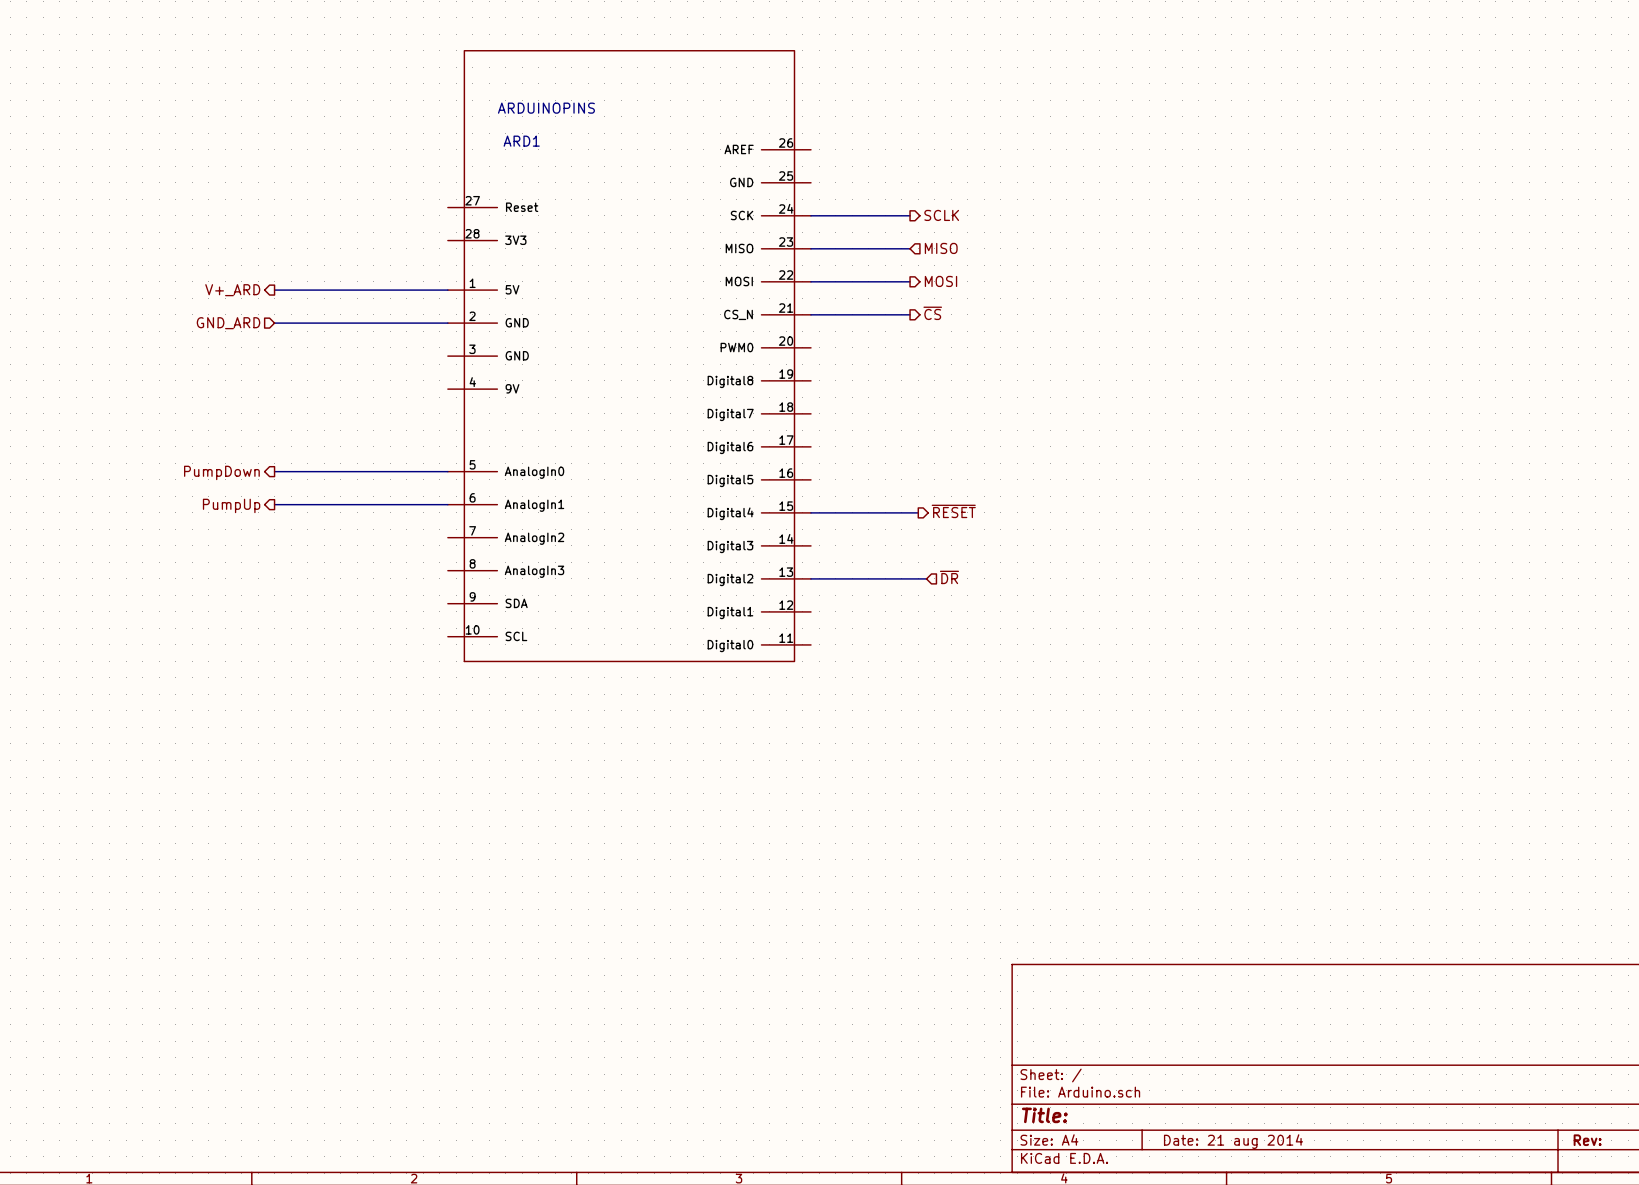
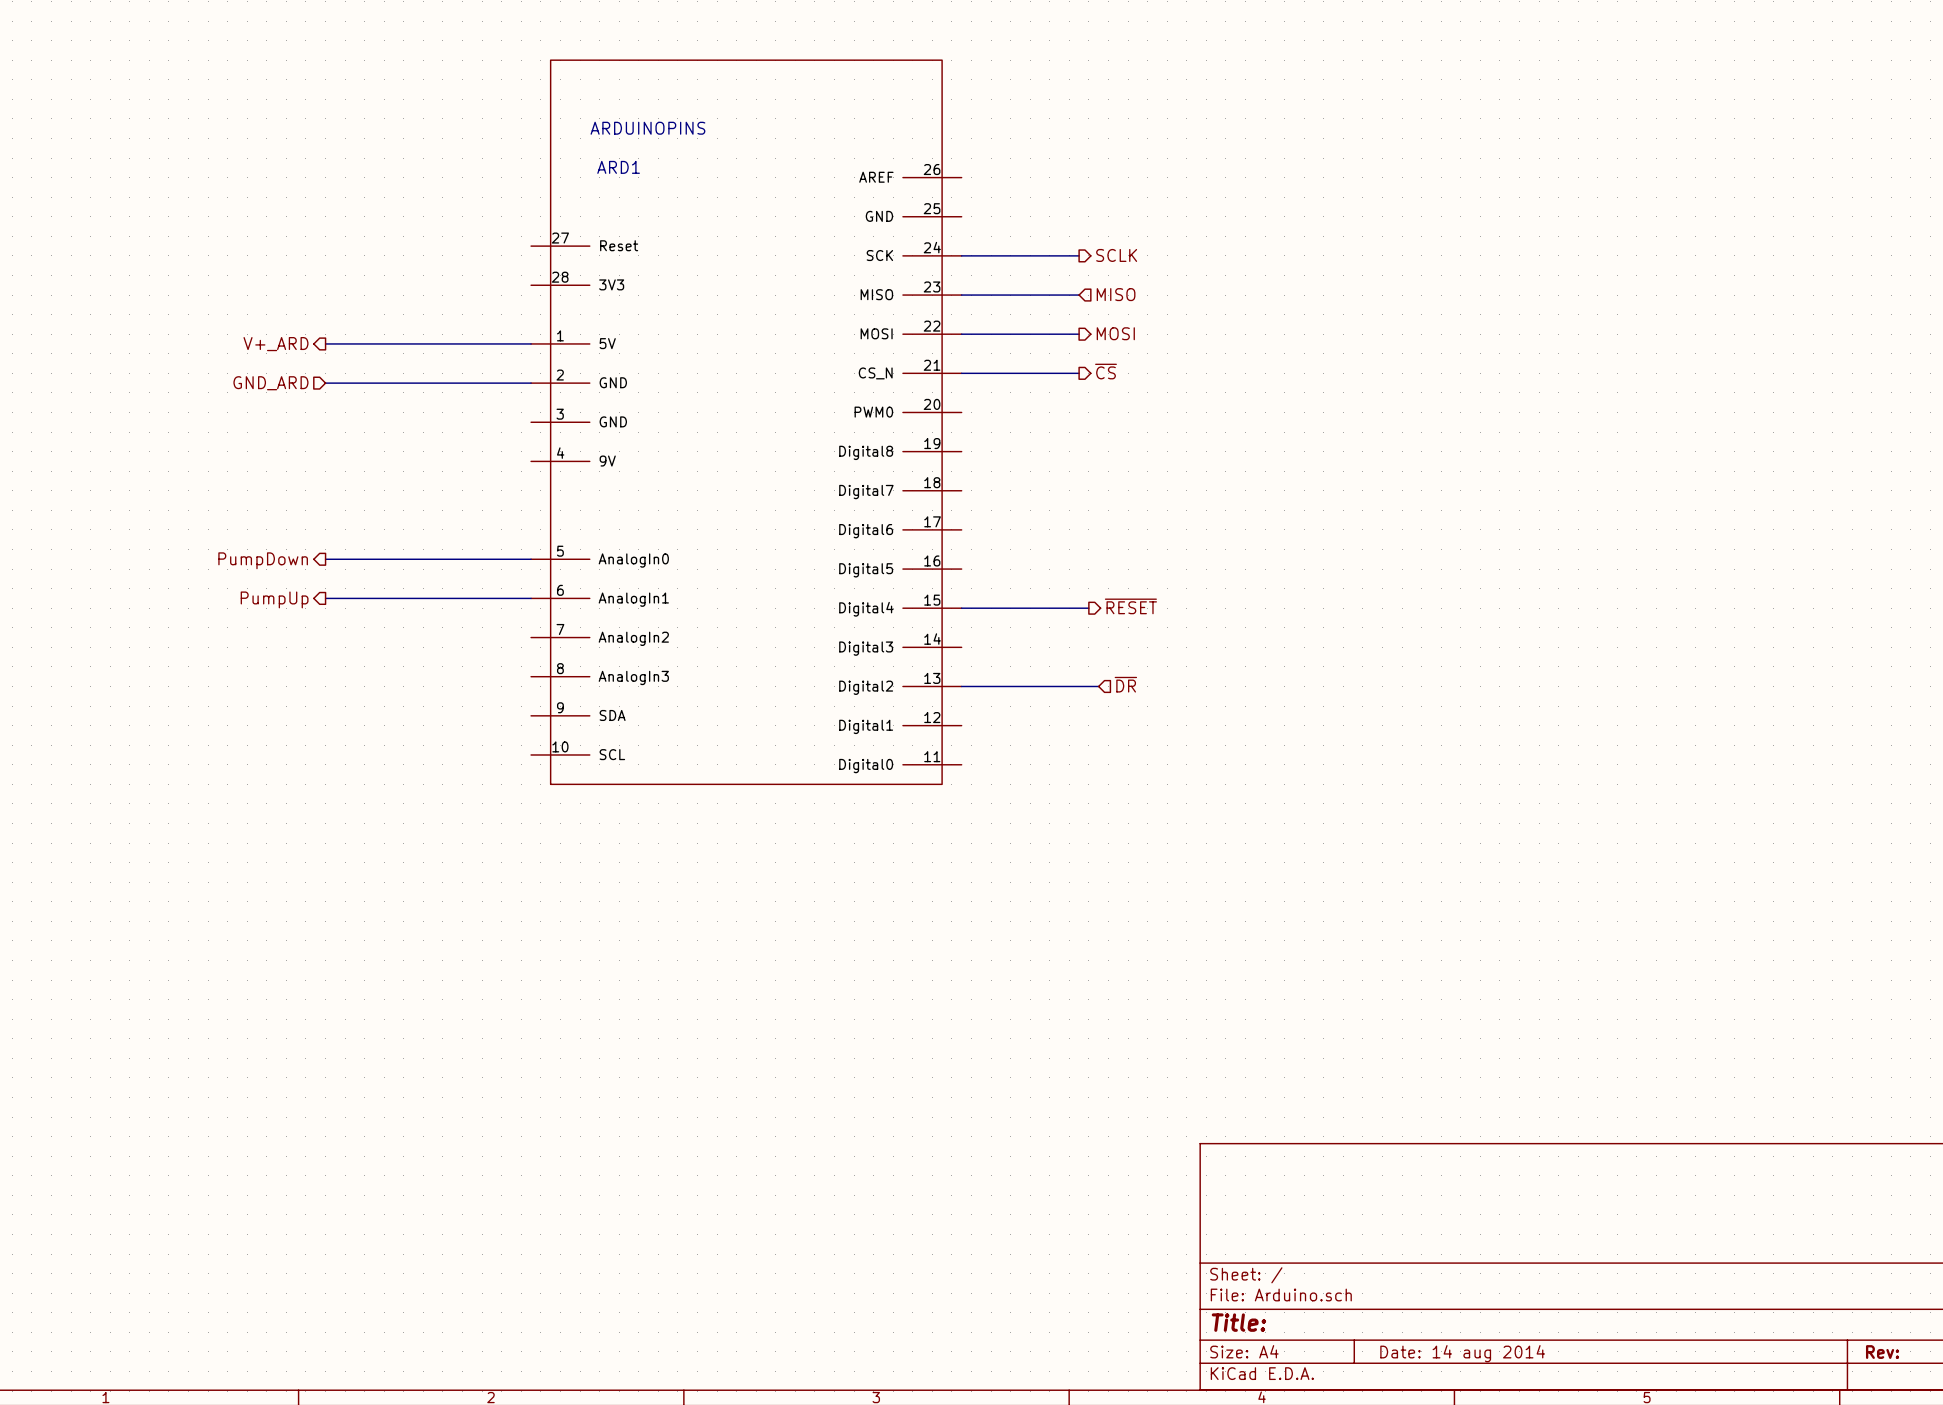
title block: Date: 21 aug 2014 (1233, 1141) -> Date: 14 aug 2014 (1462, 1353)

